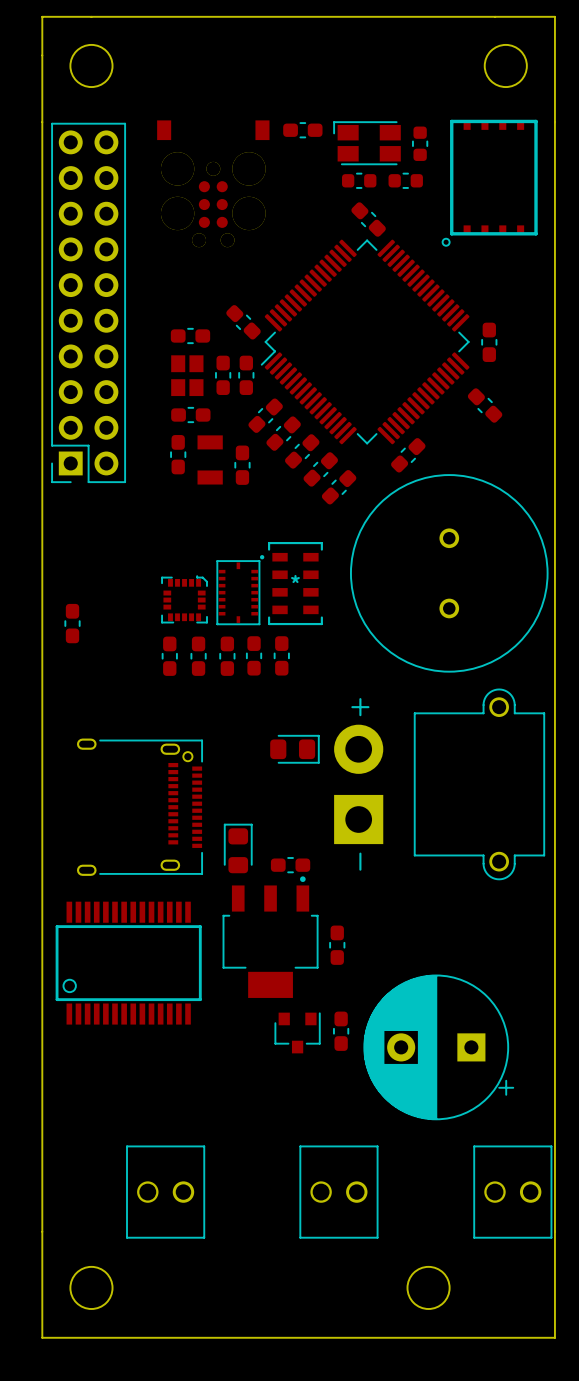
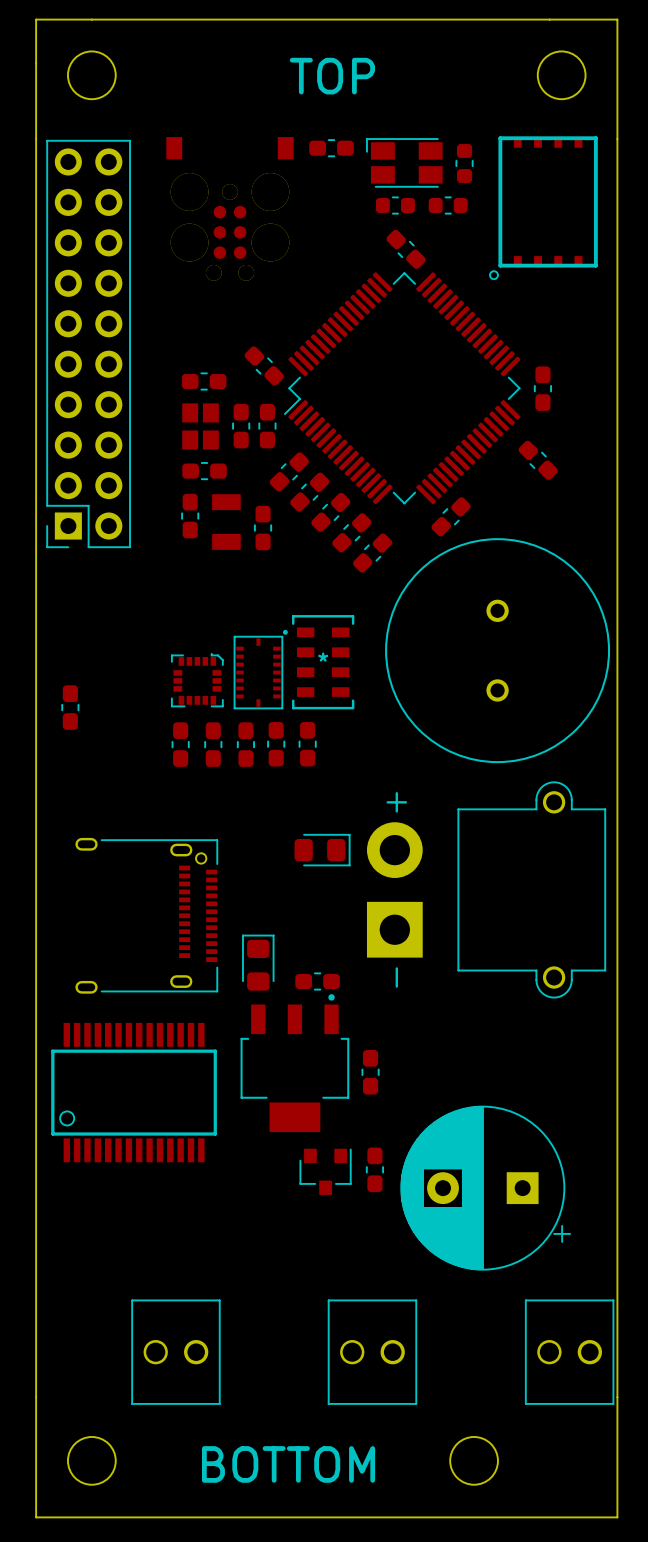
text: none -> TOP (332, 76)
text: none -> BOTTOM (288, 1464)

